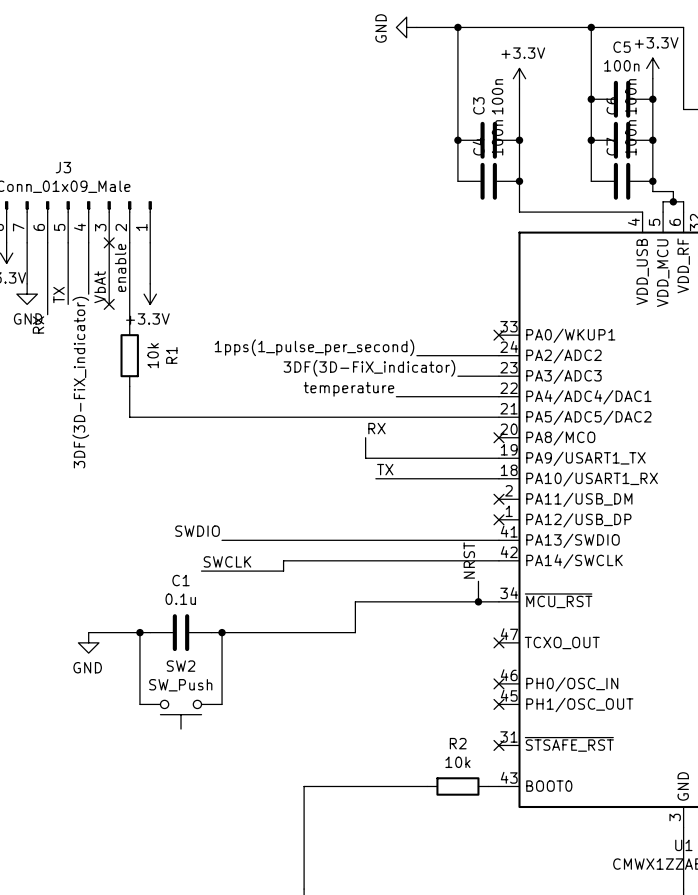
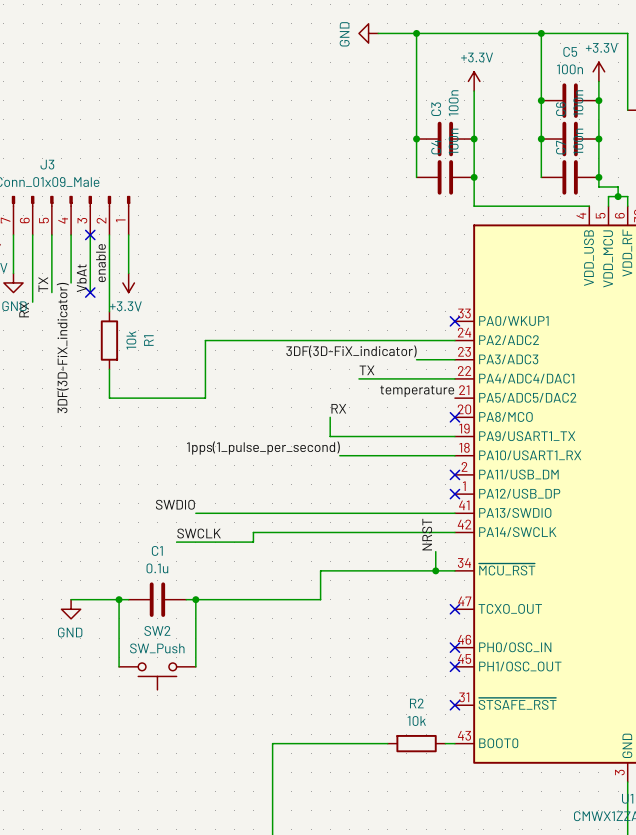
label: 1pps(1_pulse_per_second) (314, 347) -> none
label: temperature (348, 389) -> TX (366, 370)
label: none -> temperature (417, 391)
wire: (232, 417) (498, 417) -> (205, 398) (205, 340) (378, 340)
label: TX (385, 469) -> 1pps(1_pulse_per_second) (263, 448)

